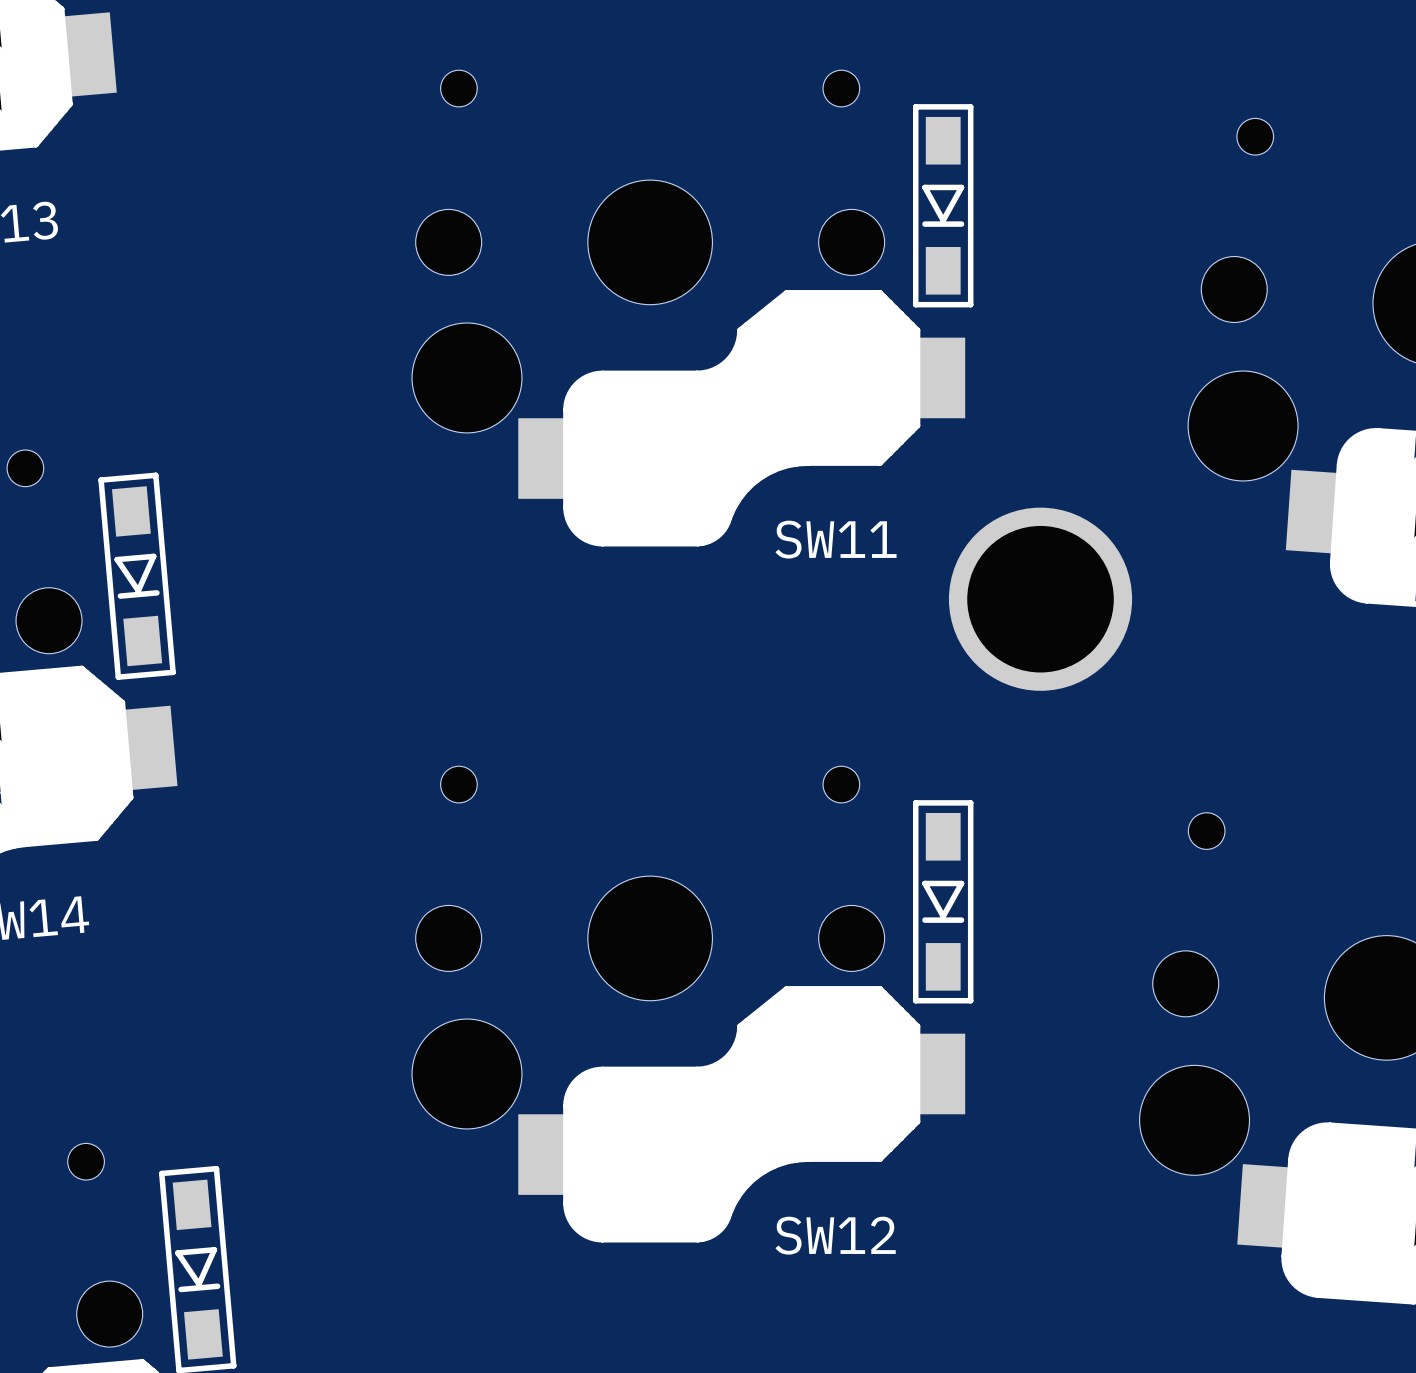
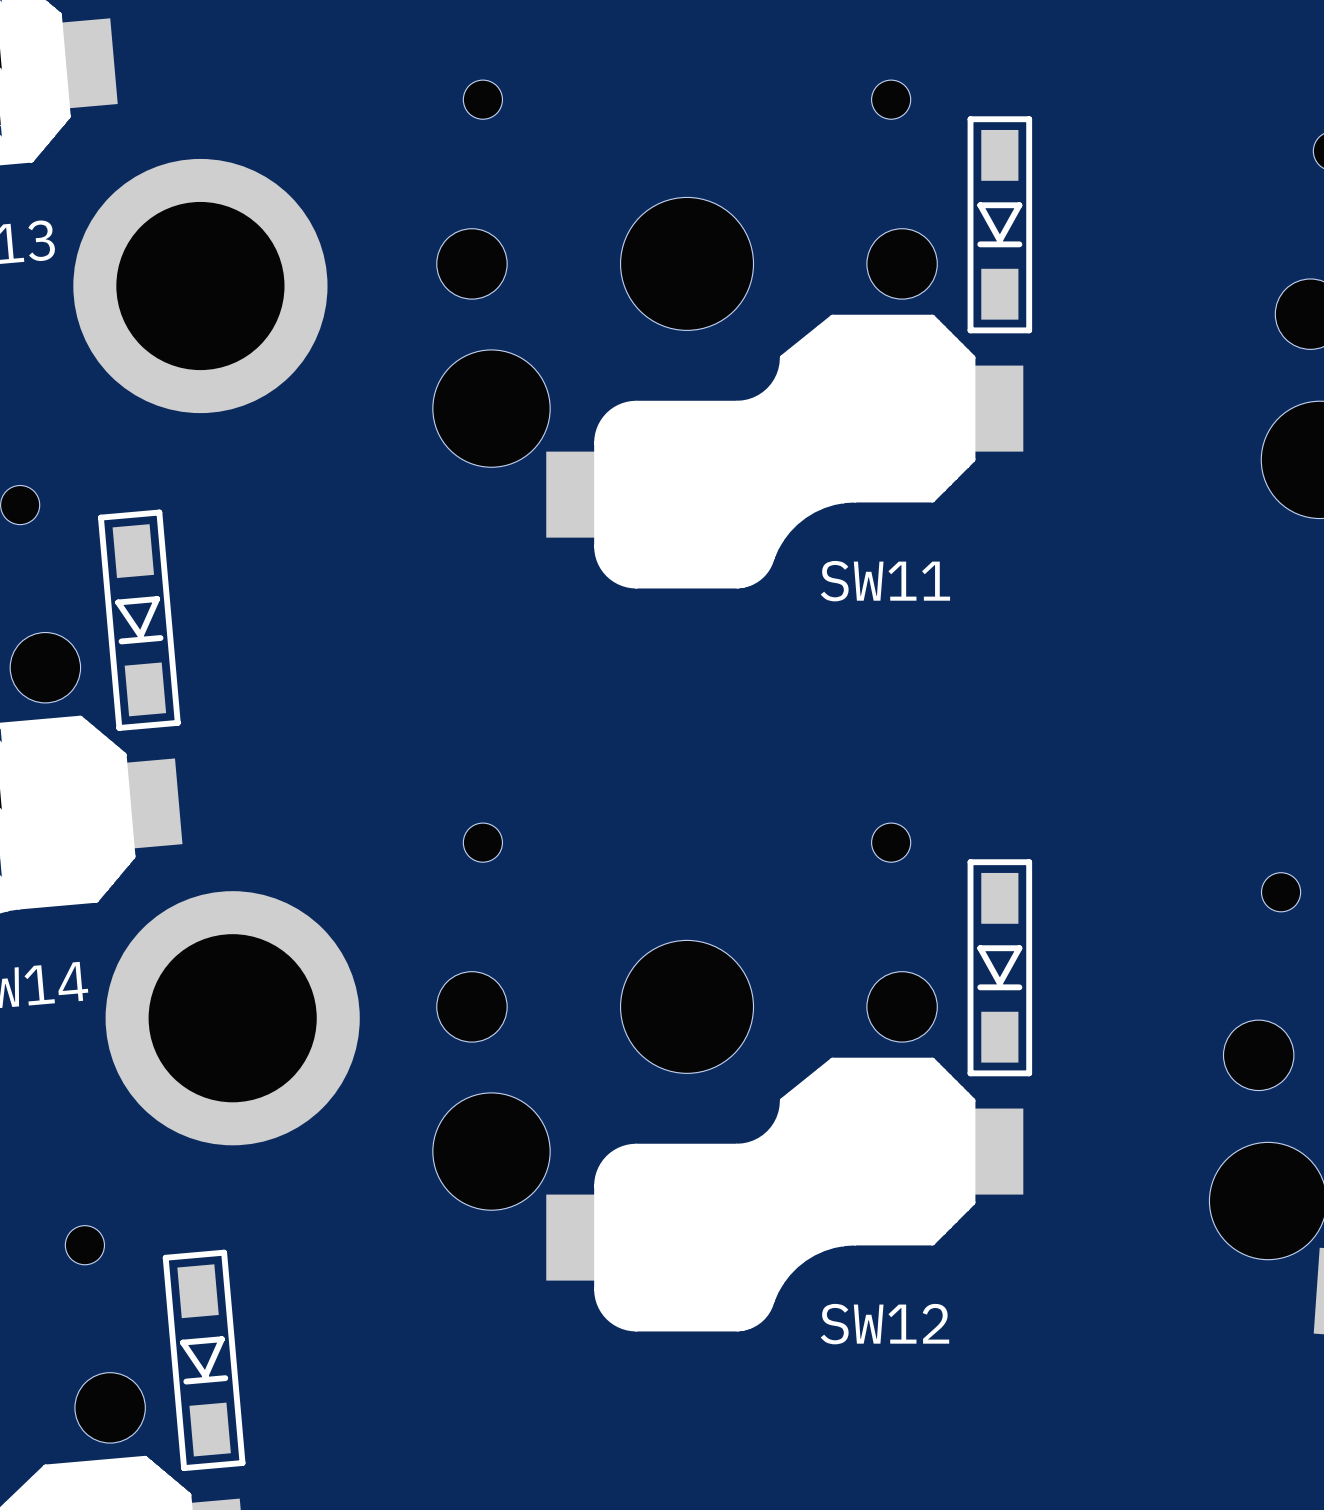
part: none -> (200, 286)
part: (1040, 599) -> none
part: none -> (232, 1018)

